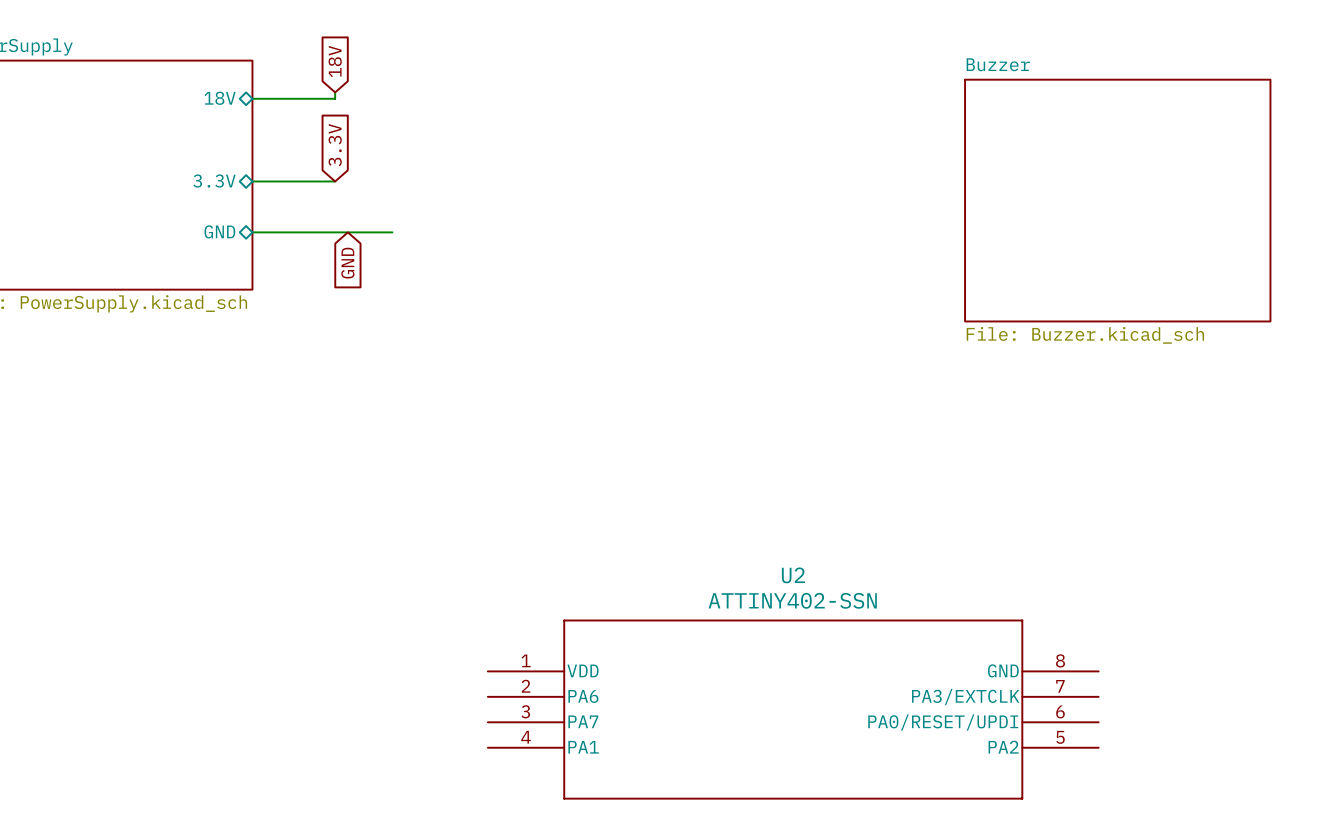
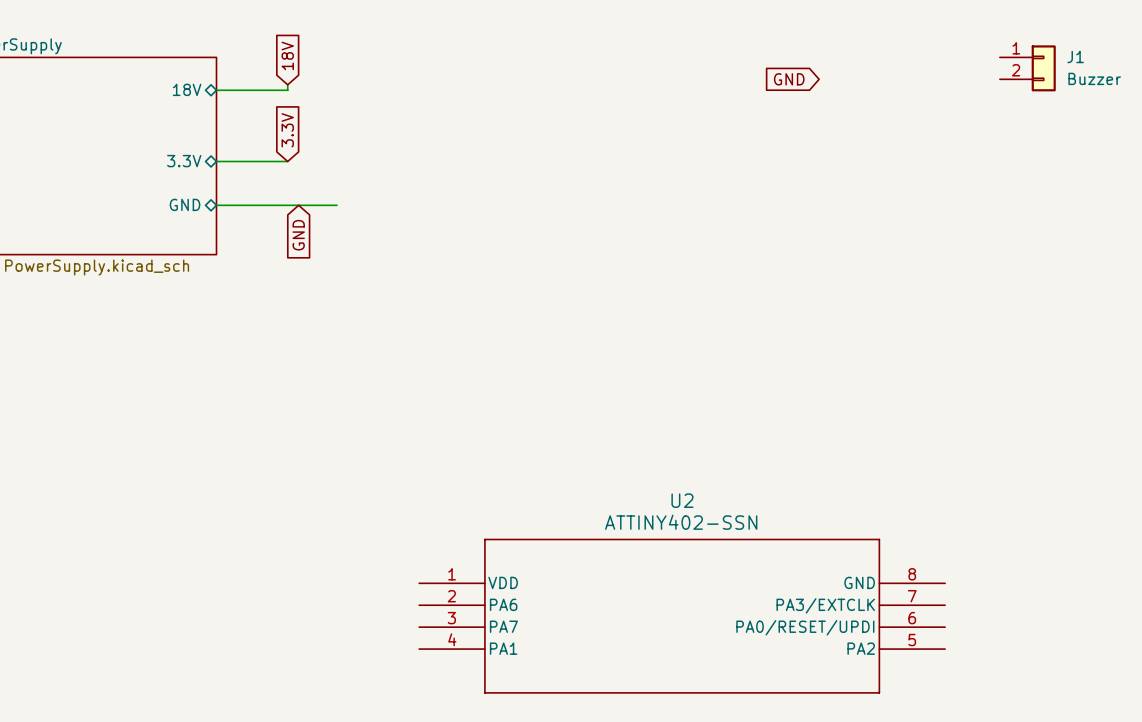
J1: none -> Buzzer (1027, 68)
global label: none -> GND (789, 79)
sheet Buzzer: File: Buzzer.kicad_sch (1117, 200) -> none

